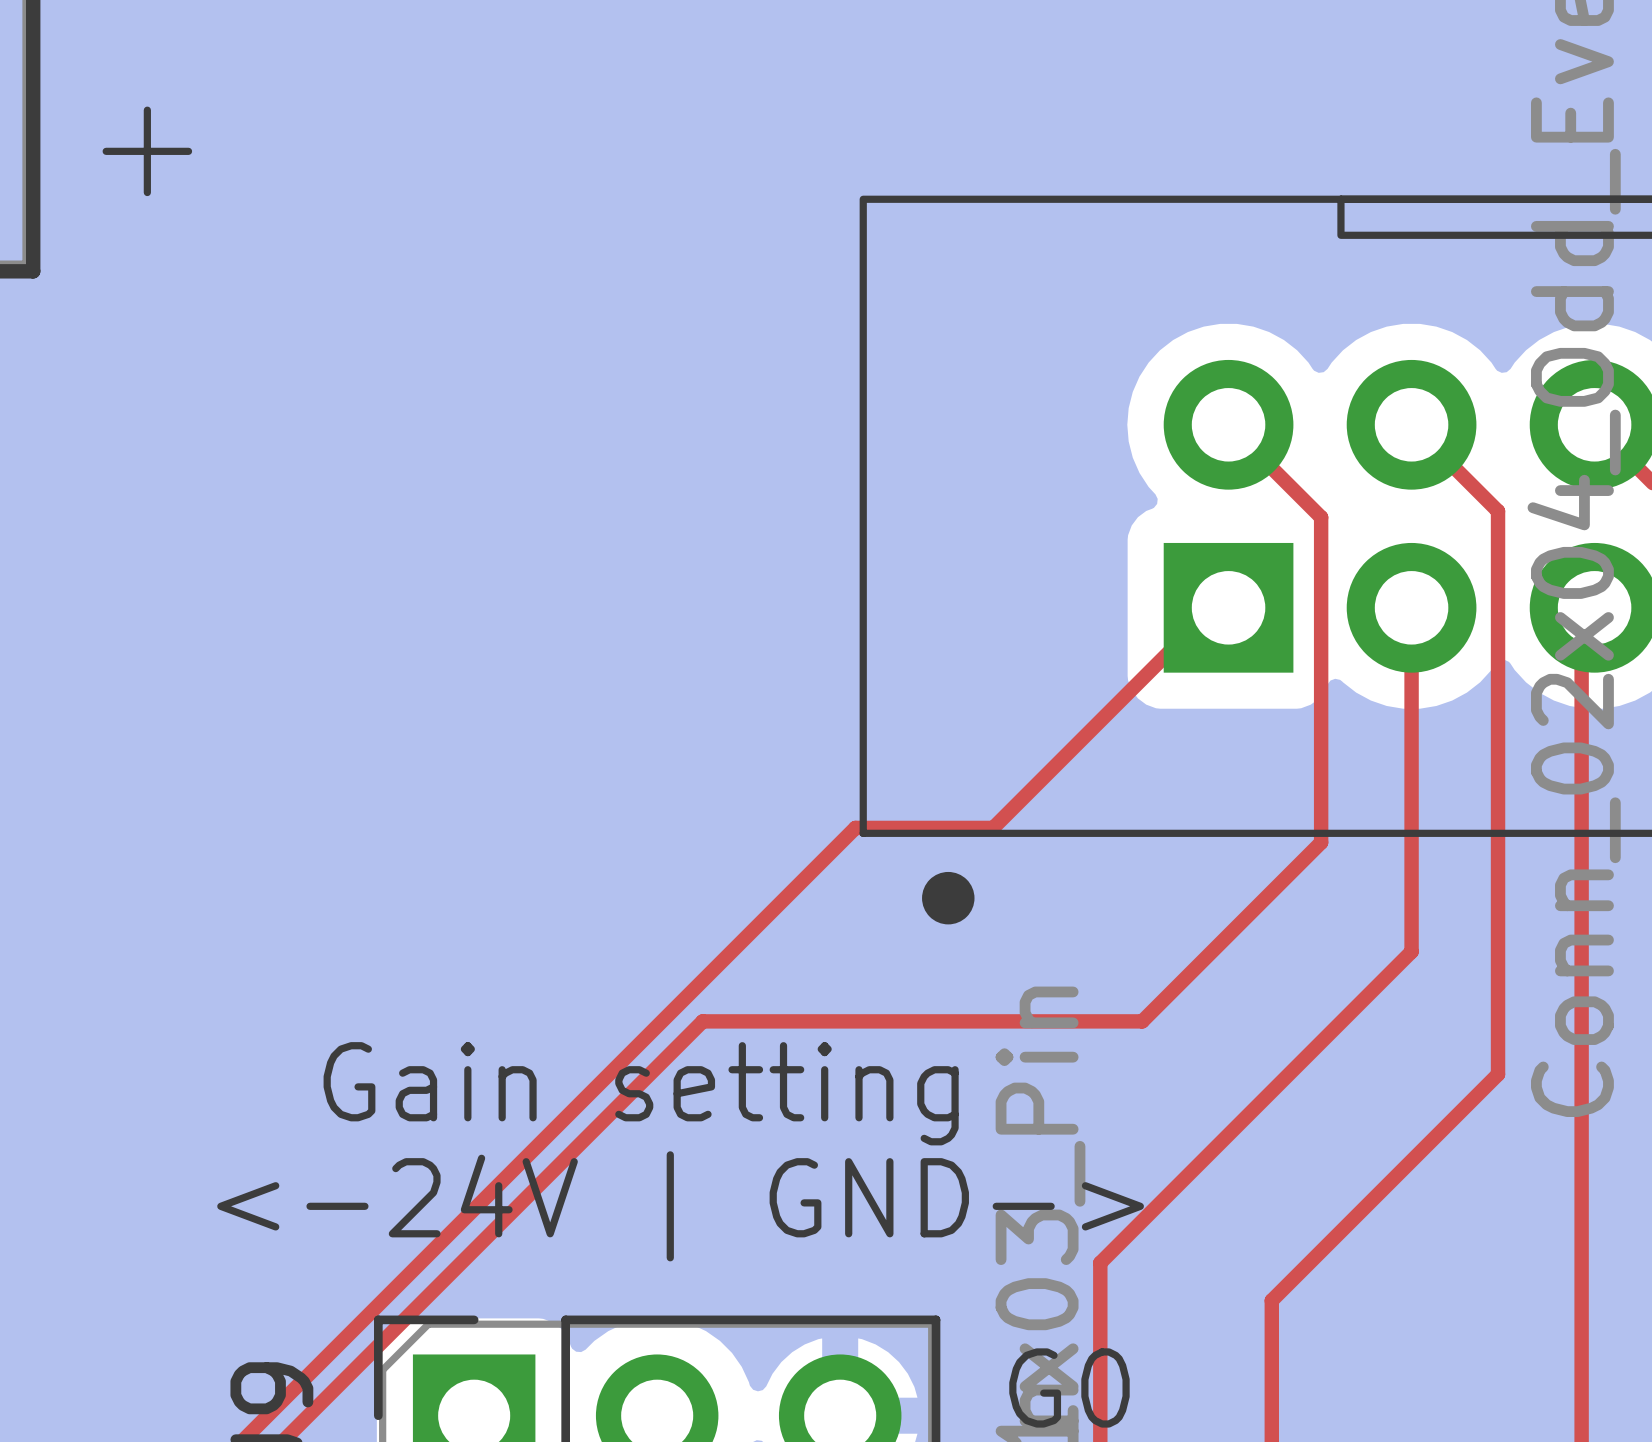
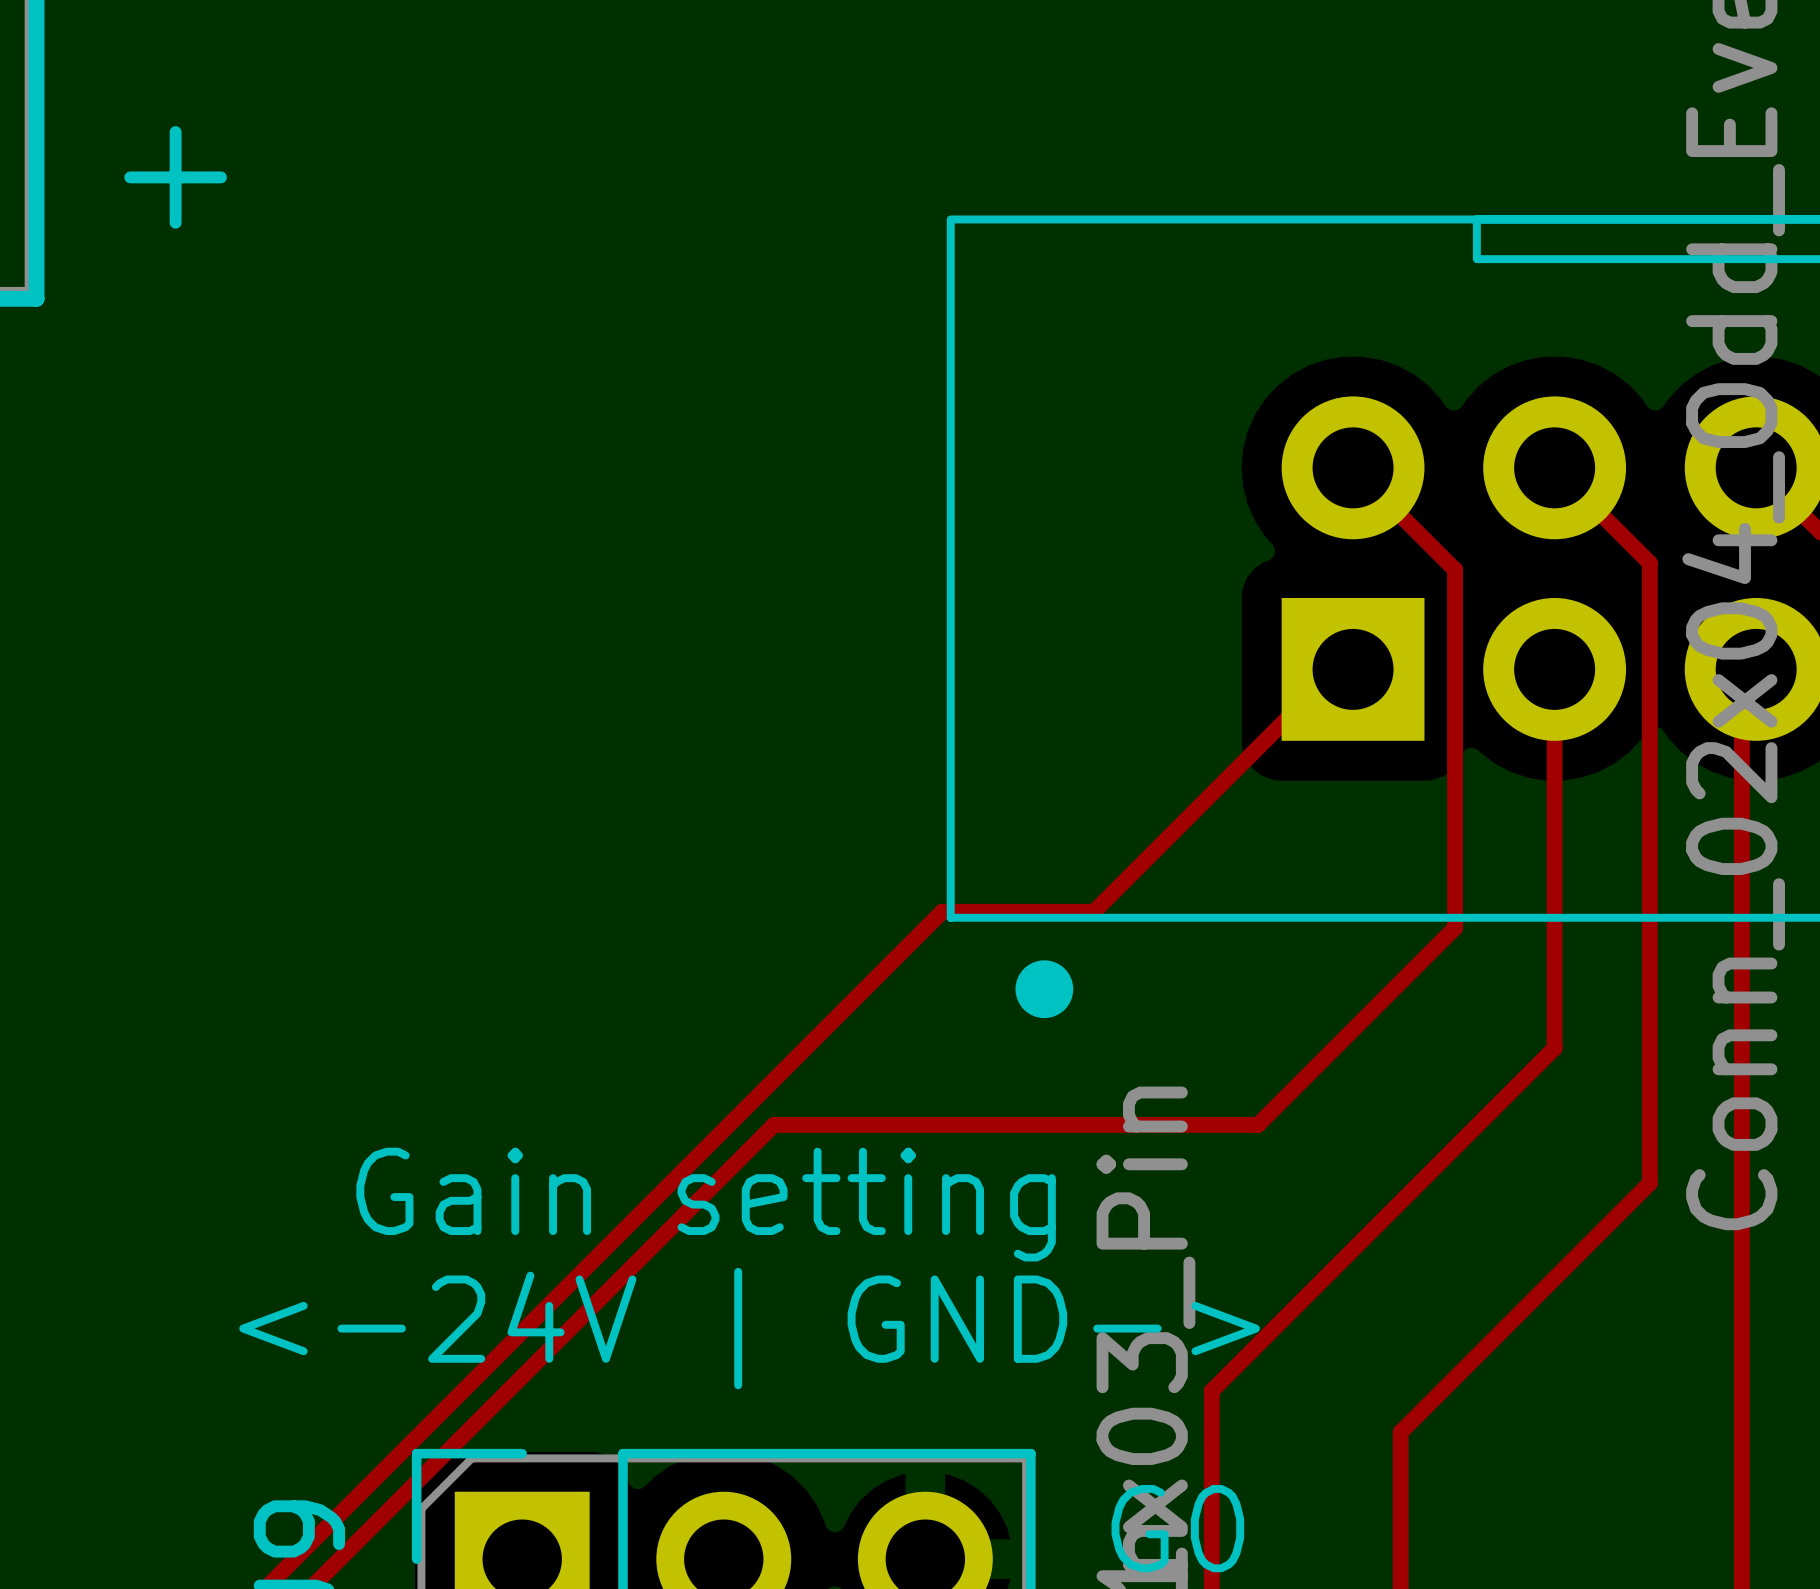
text position: + (147, 151) -> + (175, 177)

